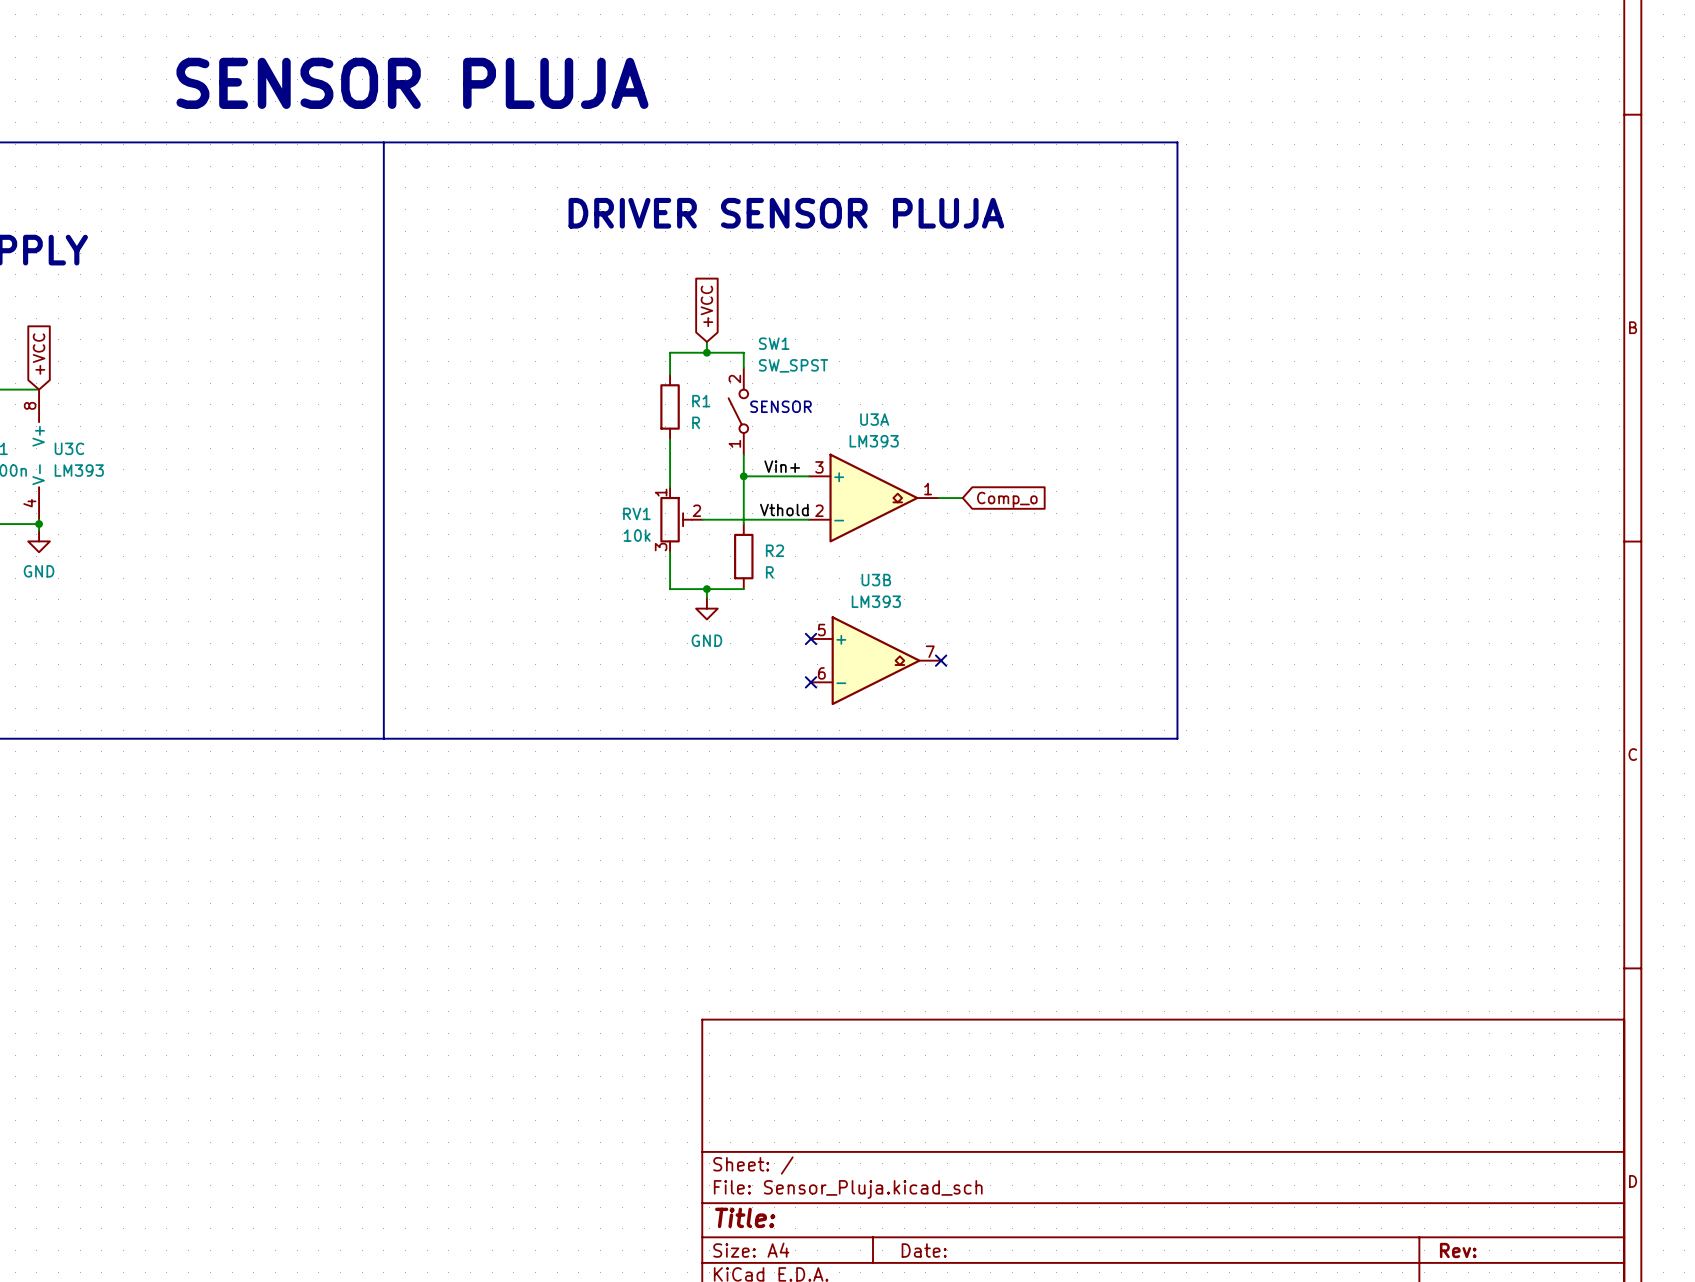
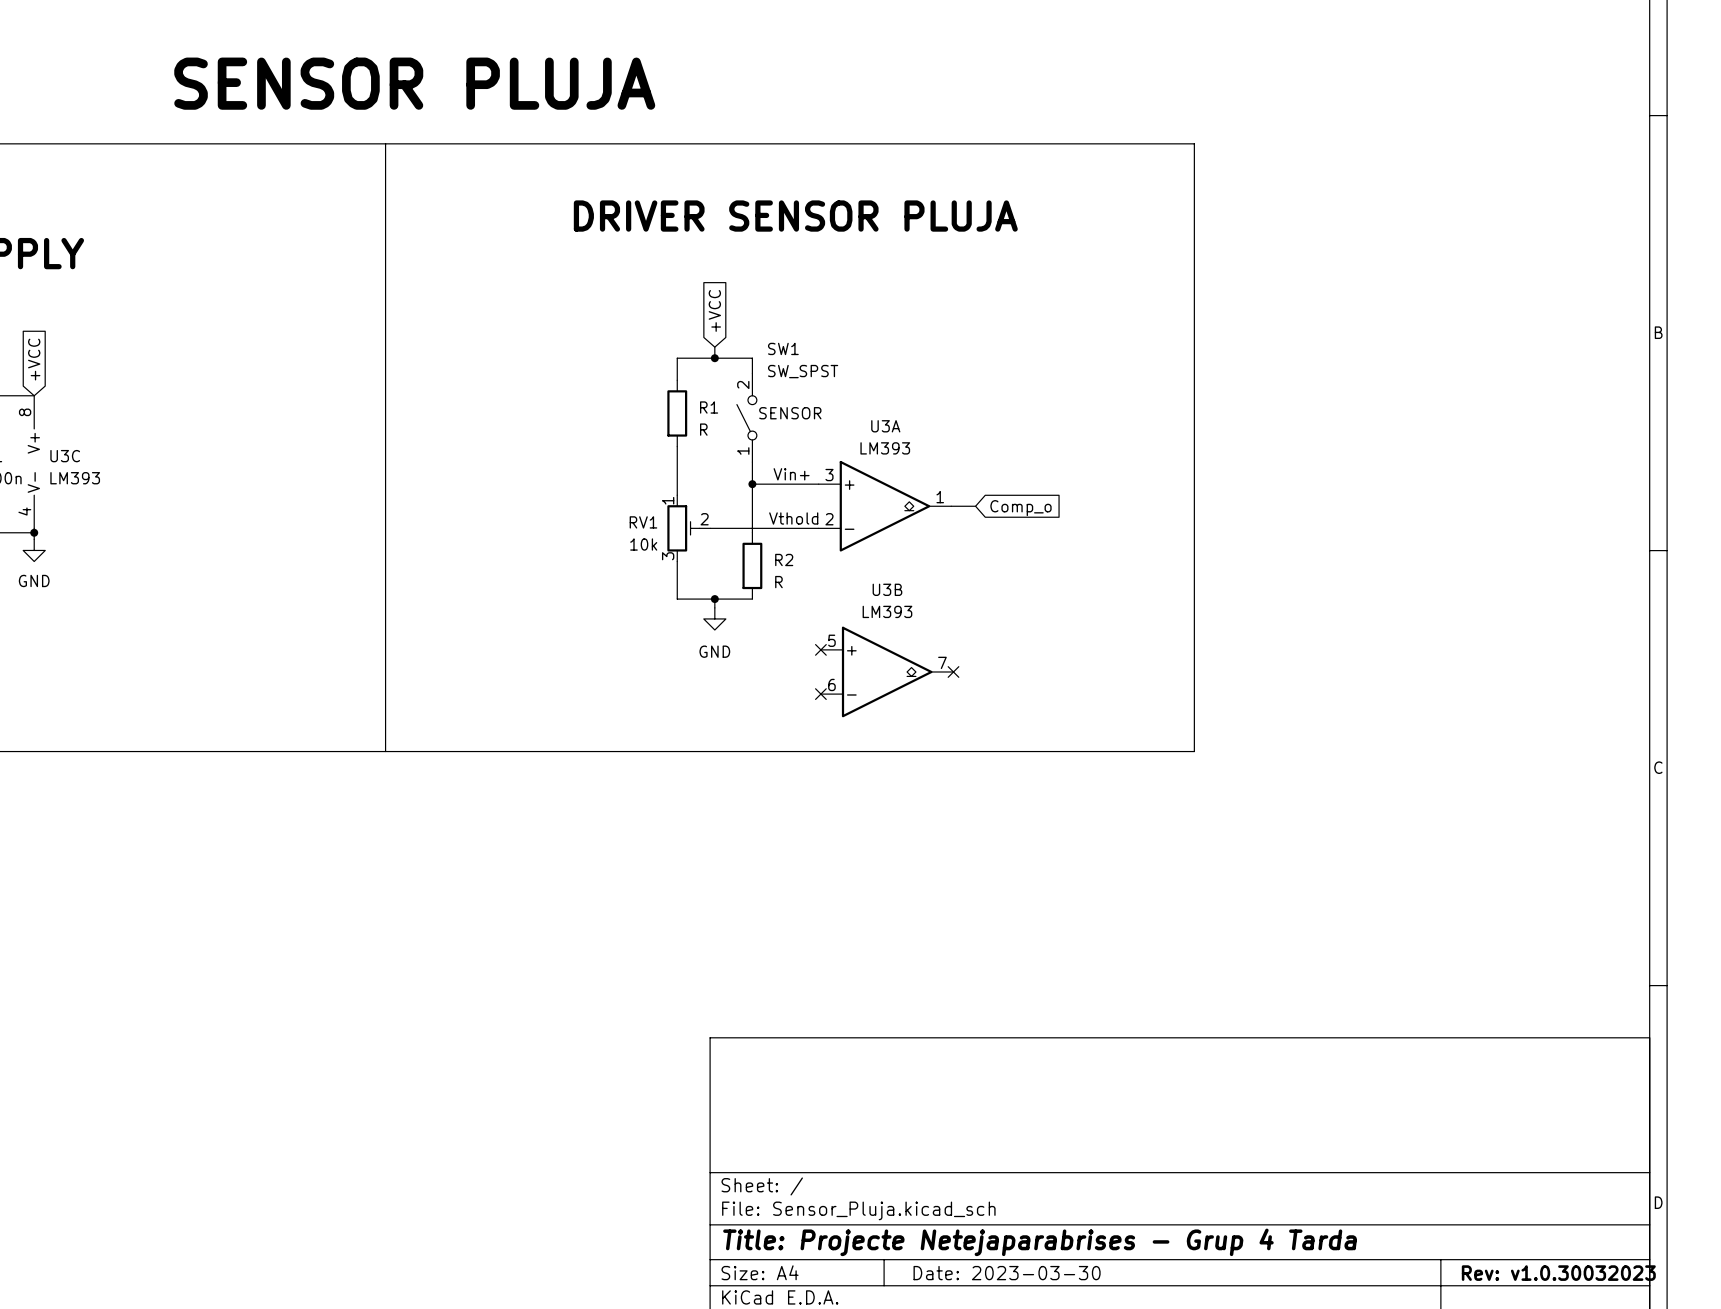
title block: Title: (745, 1217) -> Title: Projecte Netejaparabrises - Grup 4 Tarda (1040, 1242)
title block: Date: (924, 1250) -> Date: 2023-03-30 (1007, 1273)
title block: Rev: (1458, 1250) -> Rev: v1.0.30032023 (1558, 1273)

